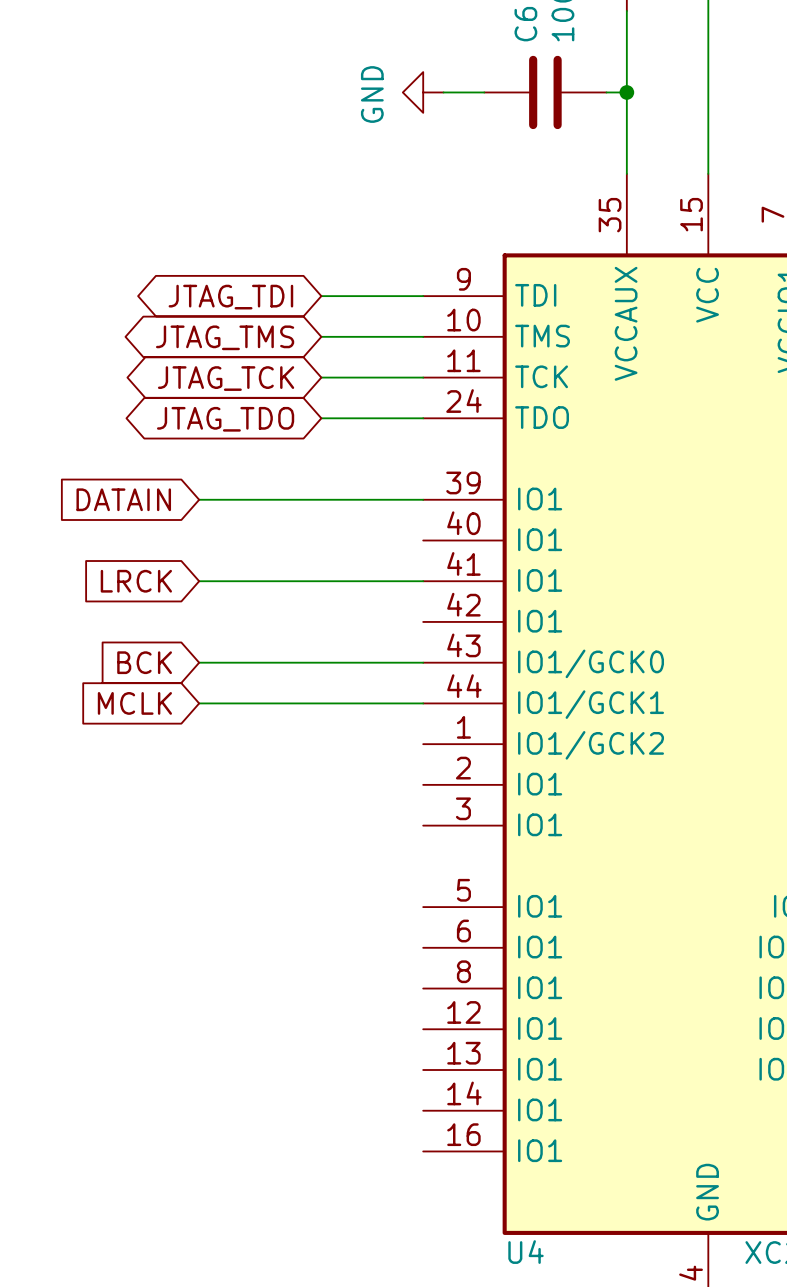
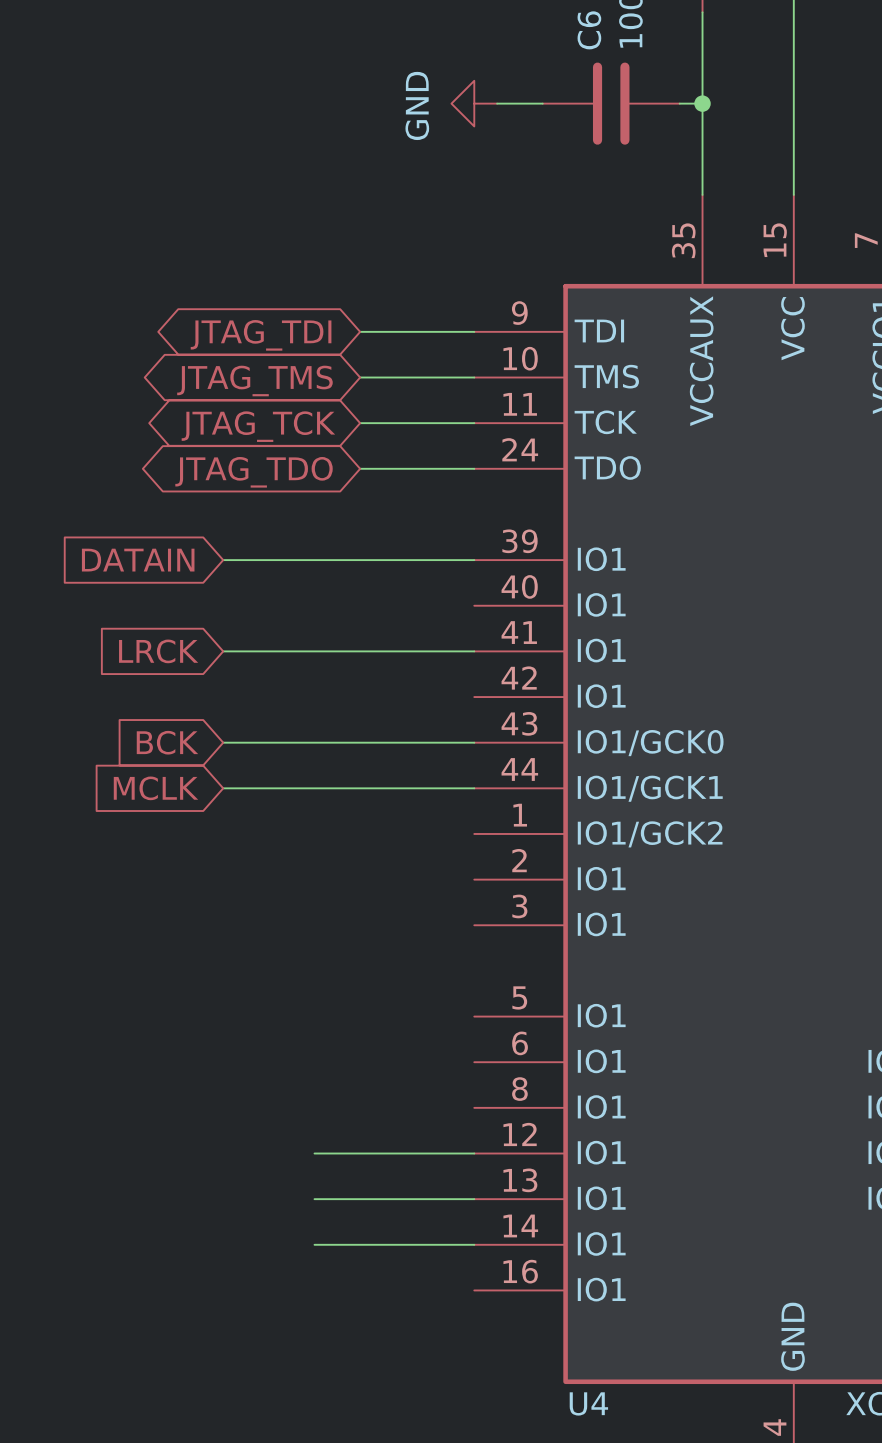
wire: none -> (314, 1153) (474, 1153)
wire: none -> (314, 1199) (474, 1199)
wire: none -> (314, 1244) (474, 1244)

